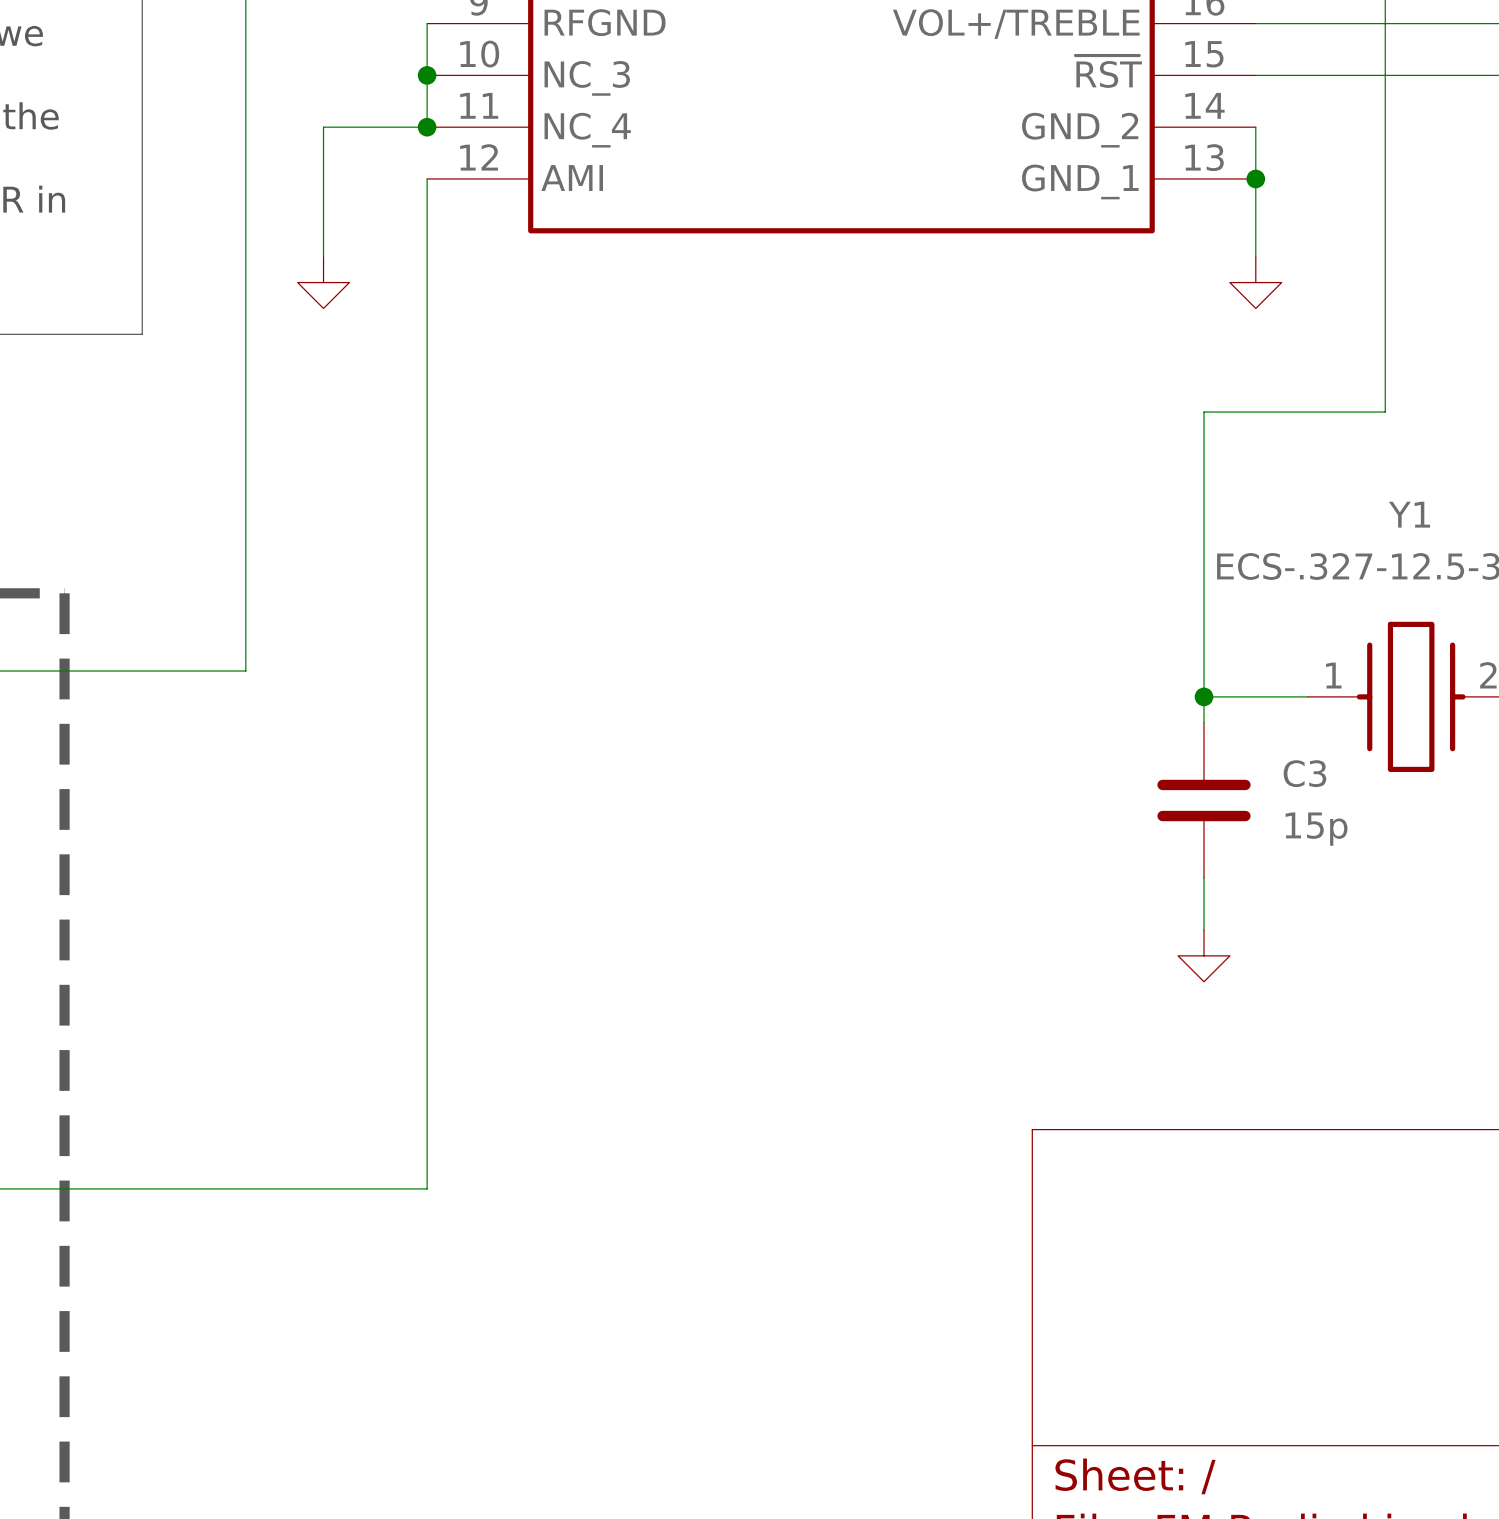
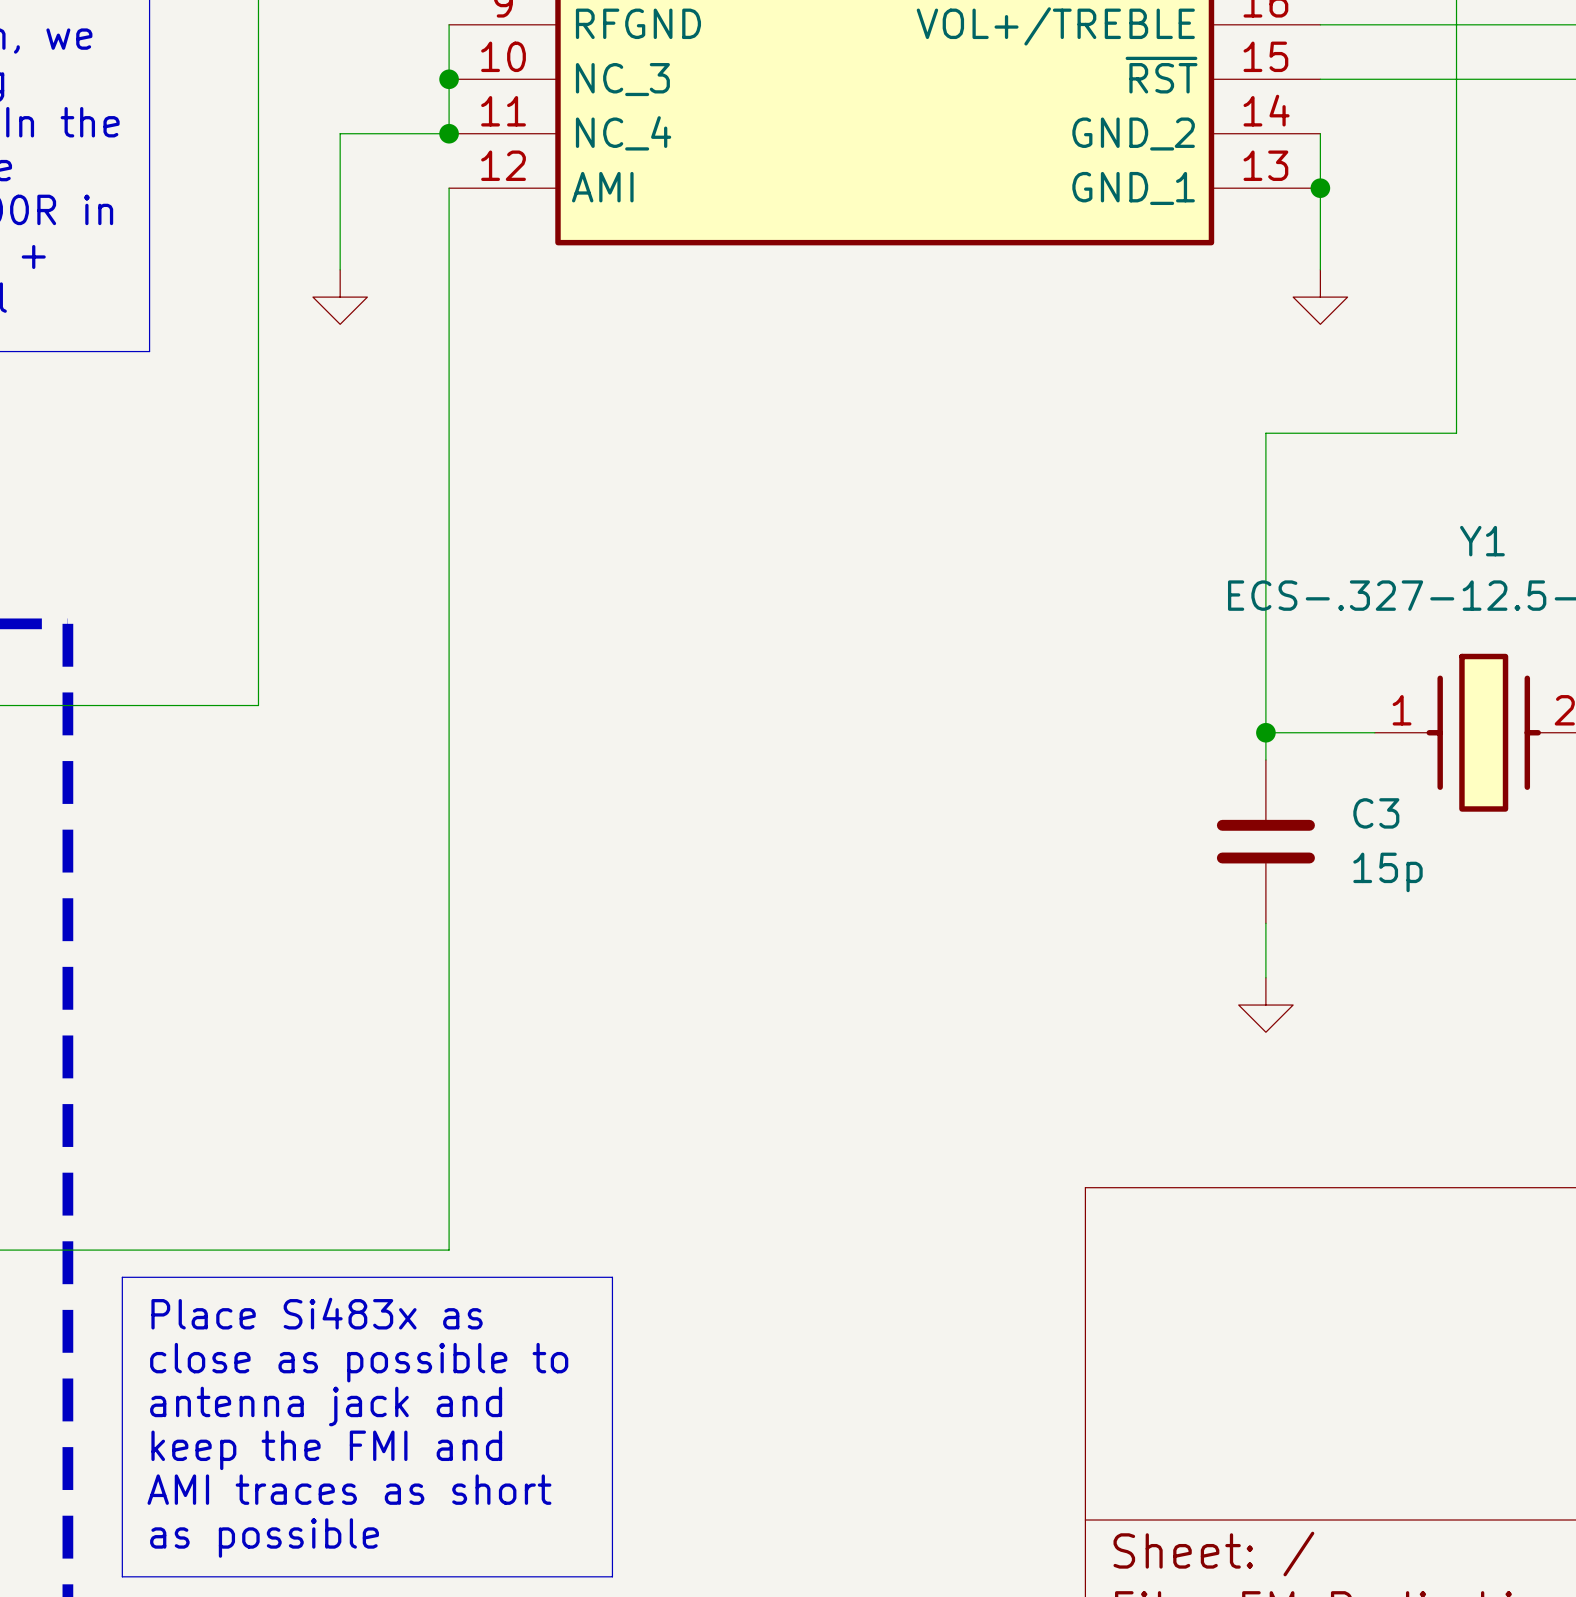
line: none -> (122, 1277) (612, 1277) (612, 1576) (122, 1576) (122, 1277)
text: none -> Place Si483x as (317, 1313)
text: none -> close as possible to (359, 1362)
text: none -> antenna jack and (326, 1406)
text: none -> keep the FMI and (326, 1450)
text: none -> AMI traces as short (349, 1489)
text: none -> as possible (264, 1537)

